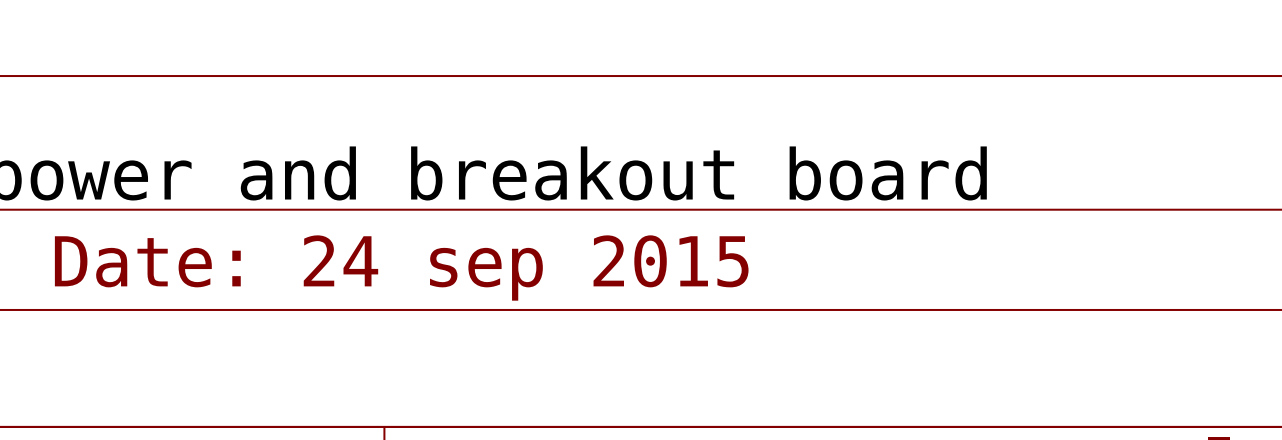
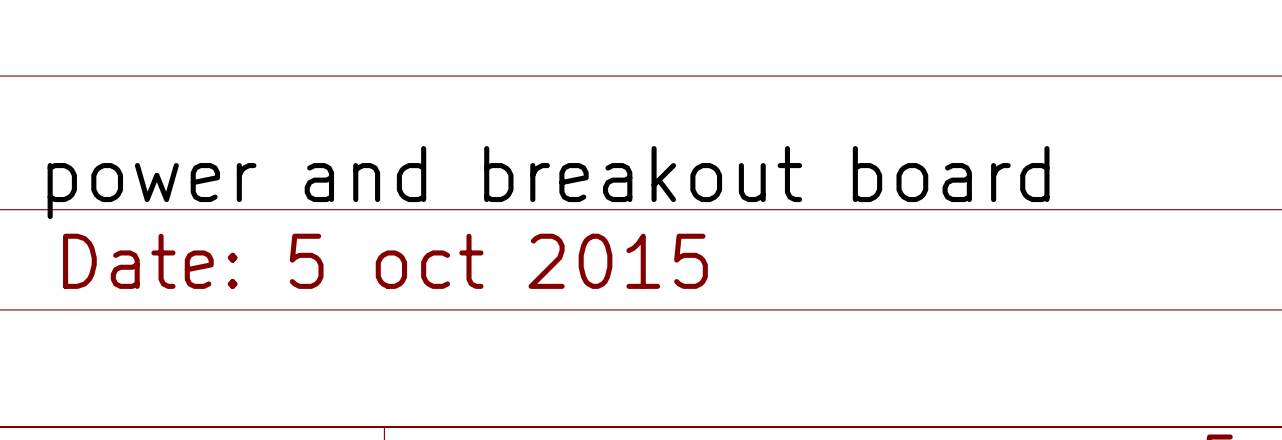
title block: Date: 24 sep 2015 (401, 268) -> Date: 5 oct 2015 (385, 261)

